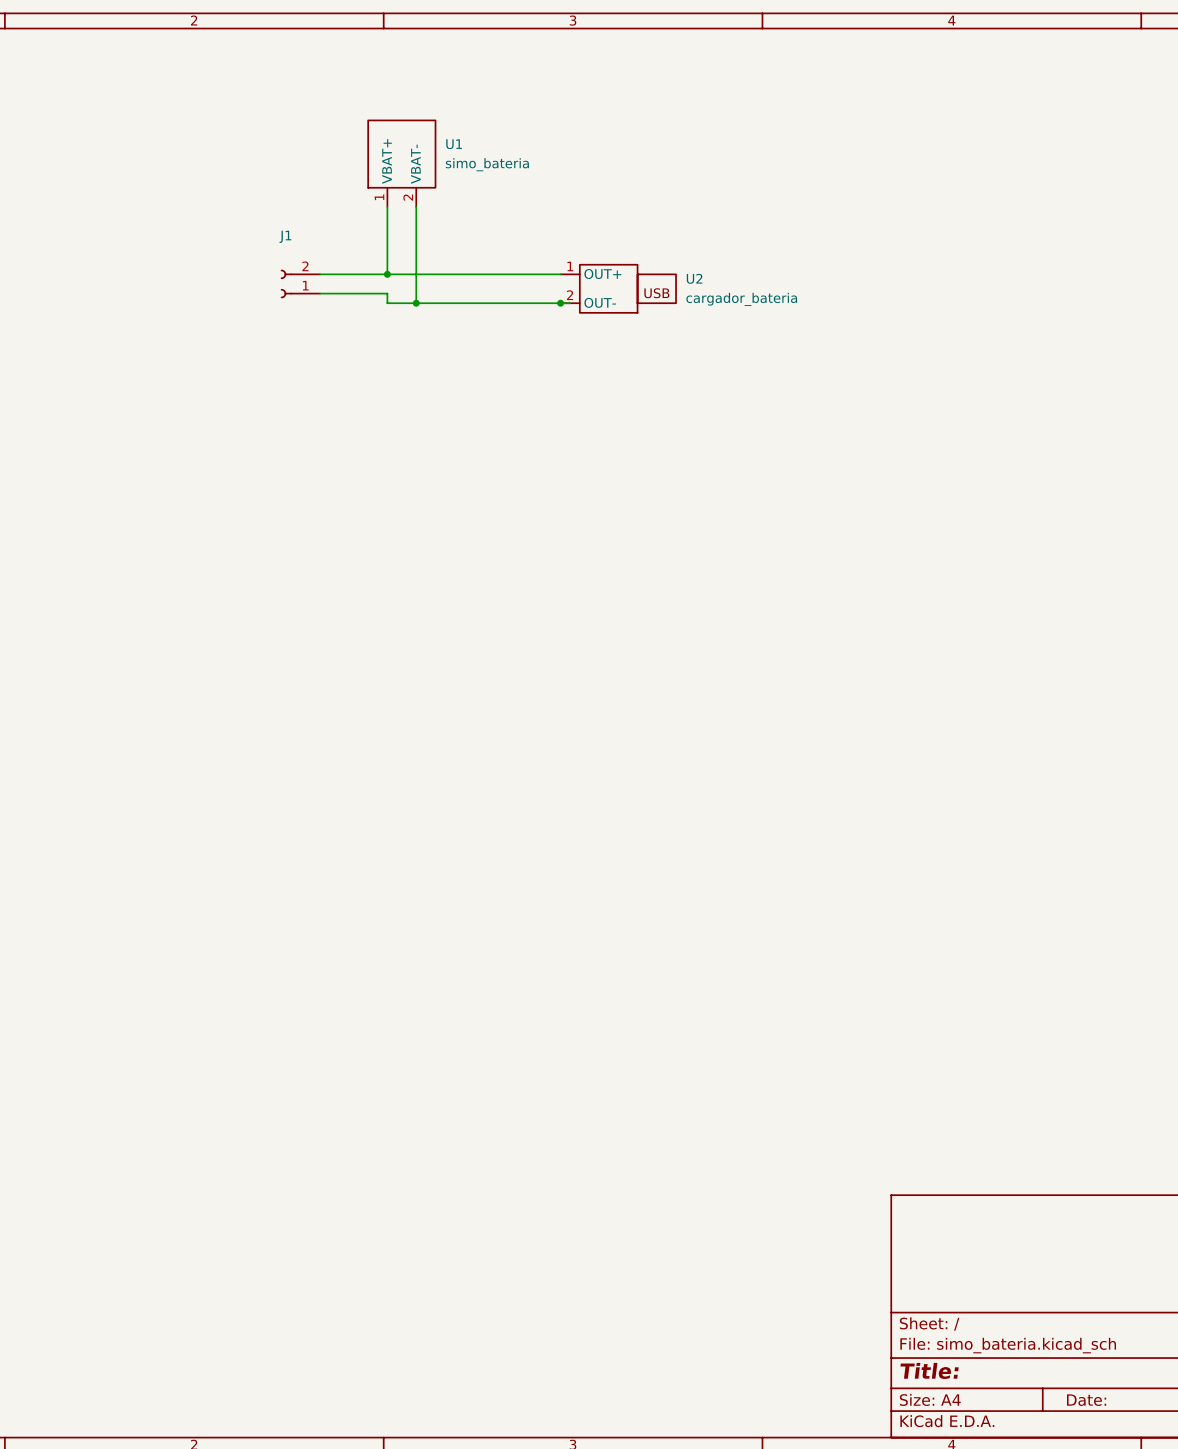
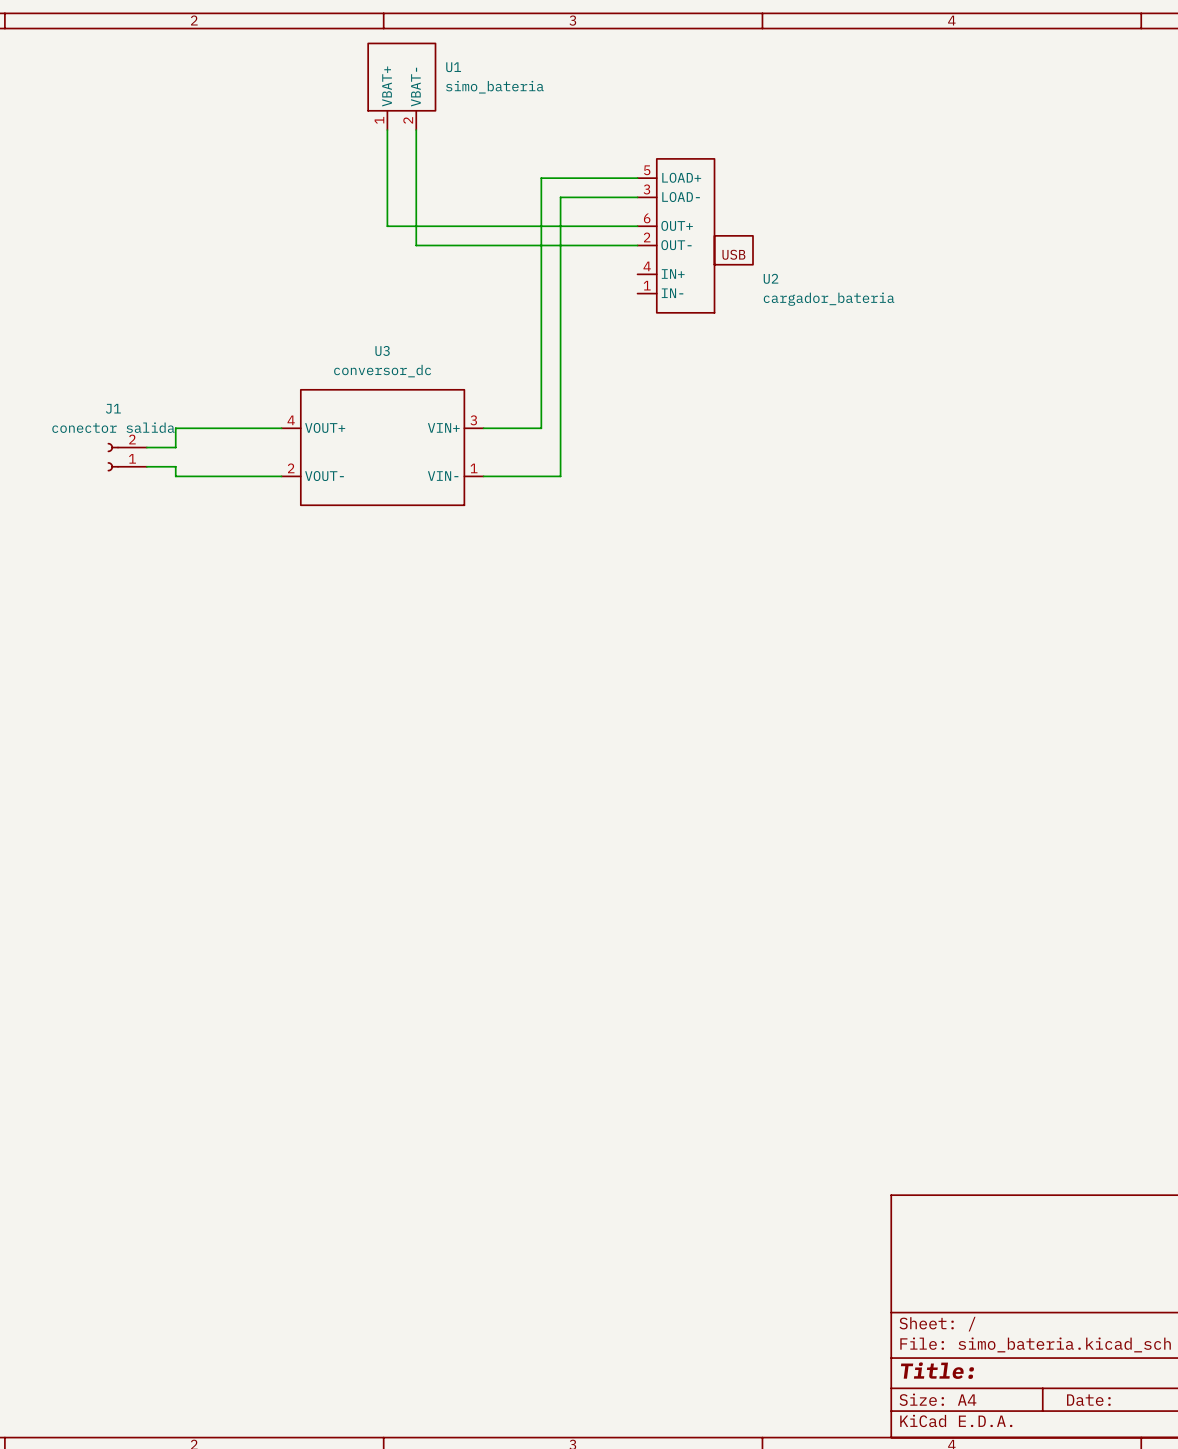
wire: none -> (387, 130) (387, 207)
wire: none -> (416, 130) (416, 207)
U1 position: (401, 163) -> (401, 86)
wire: none -> (637, 178) (541, 178) (541, 428) (483, 428)
wire: none -> (637, 197) (560, 197) (560, 476) (483, 476)
wire: (387, 226) (387, 274) -> (387, 226) (637, 226)
wire: (416, 245) (416, 303) -> (416, 245) (637, 245)
U2 symbol: [560, 264, 677, 313] -> [637, 158, 754, 313]
wire: (320, 274) (560, 274) -> none
junction: (387, 274) -> none
U2 name position: U2 (694, 278) -> U2 (771, 278)
J1 position: (300, 283) -> (127, 457)
wire: (320, 293) (387, 293) (387, 303) (570, 303) -> none
U2 value position: cargador_bateria (741, 299) -> cargador_bateria (829, 299)
junction: (416, 303) -> none
junction: (560, 303) -> none
J1 value: none -> conector salida (113, 427)
wire: none -> (281, 428) (175, 428) (175, 447) (146, 447)
U3: none -> conversor_dc (382, 447)
wire: none -> (146, 466) (175, 466) (175, 476) (281, 476)

